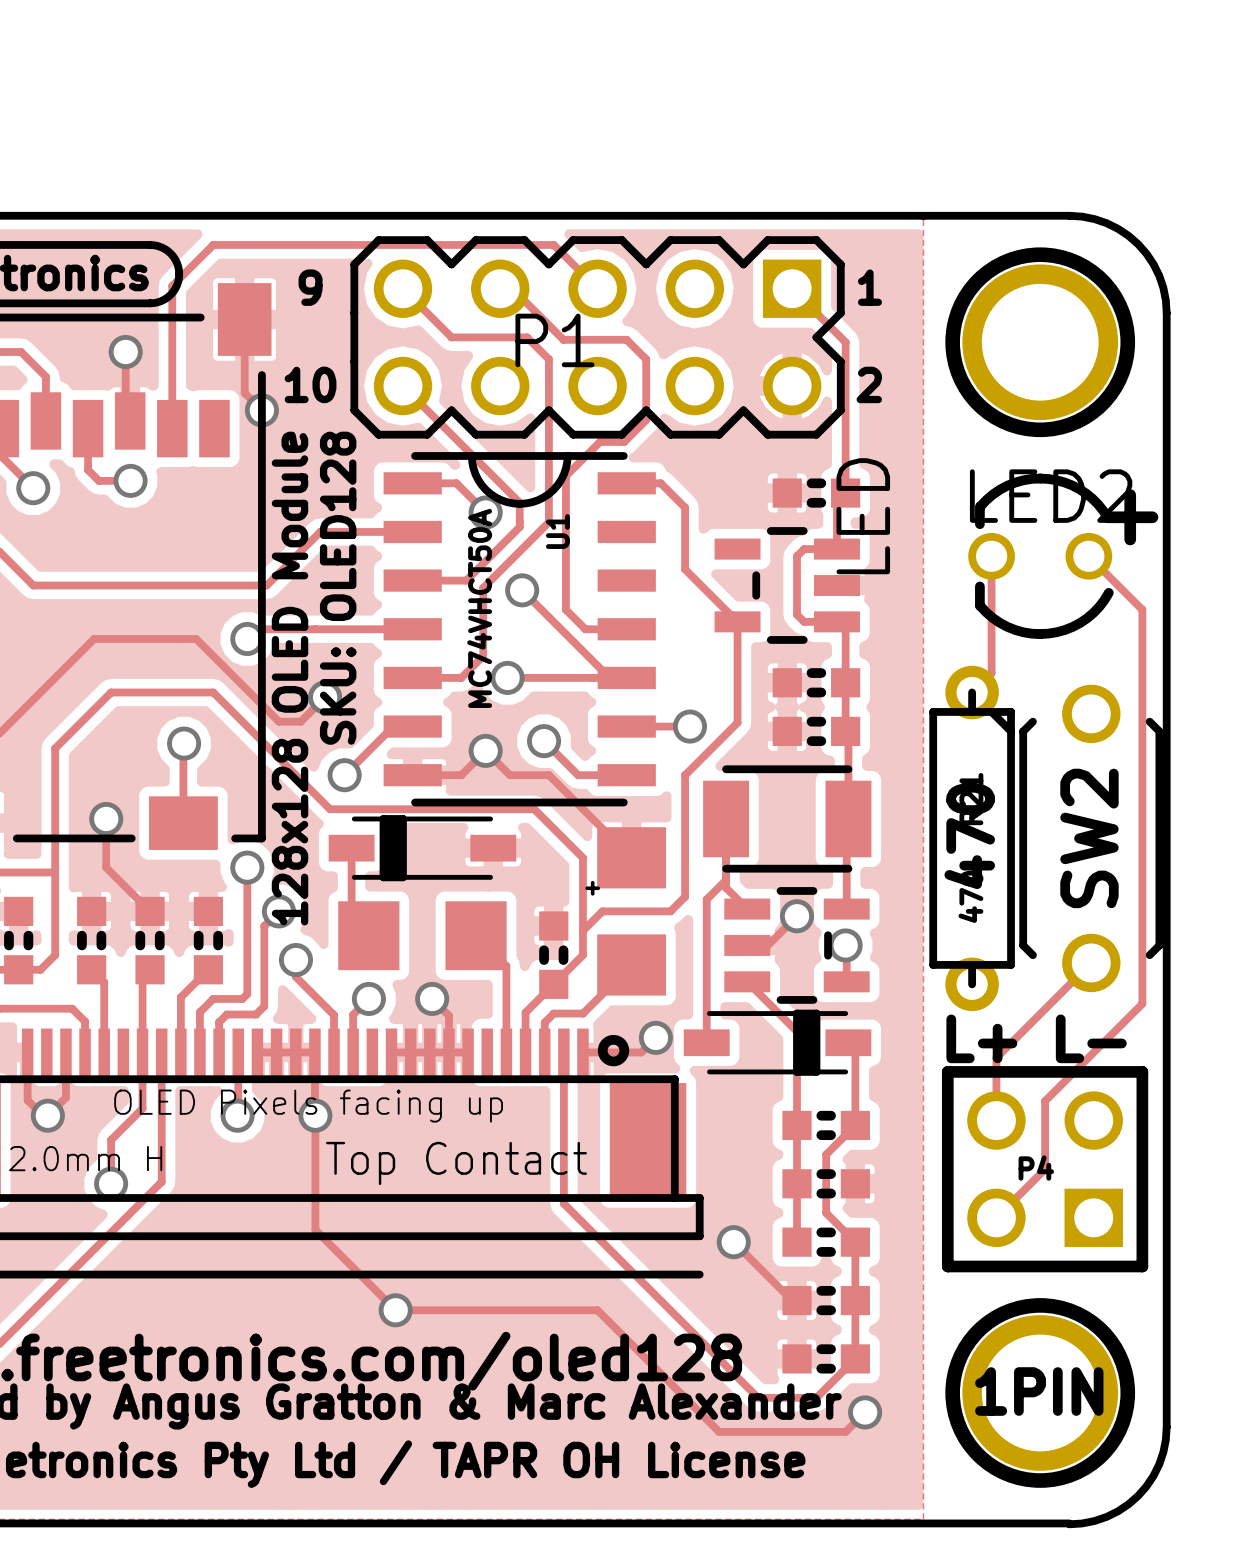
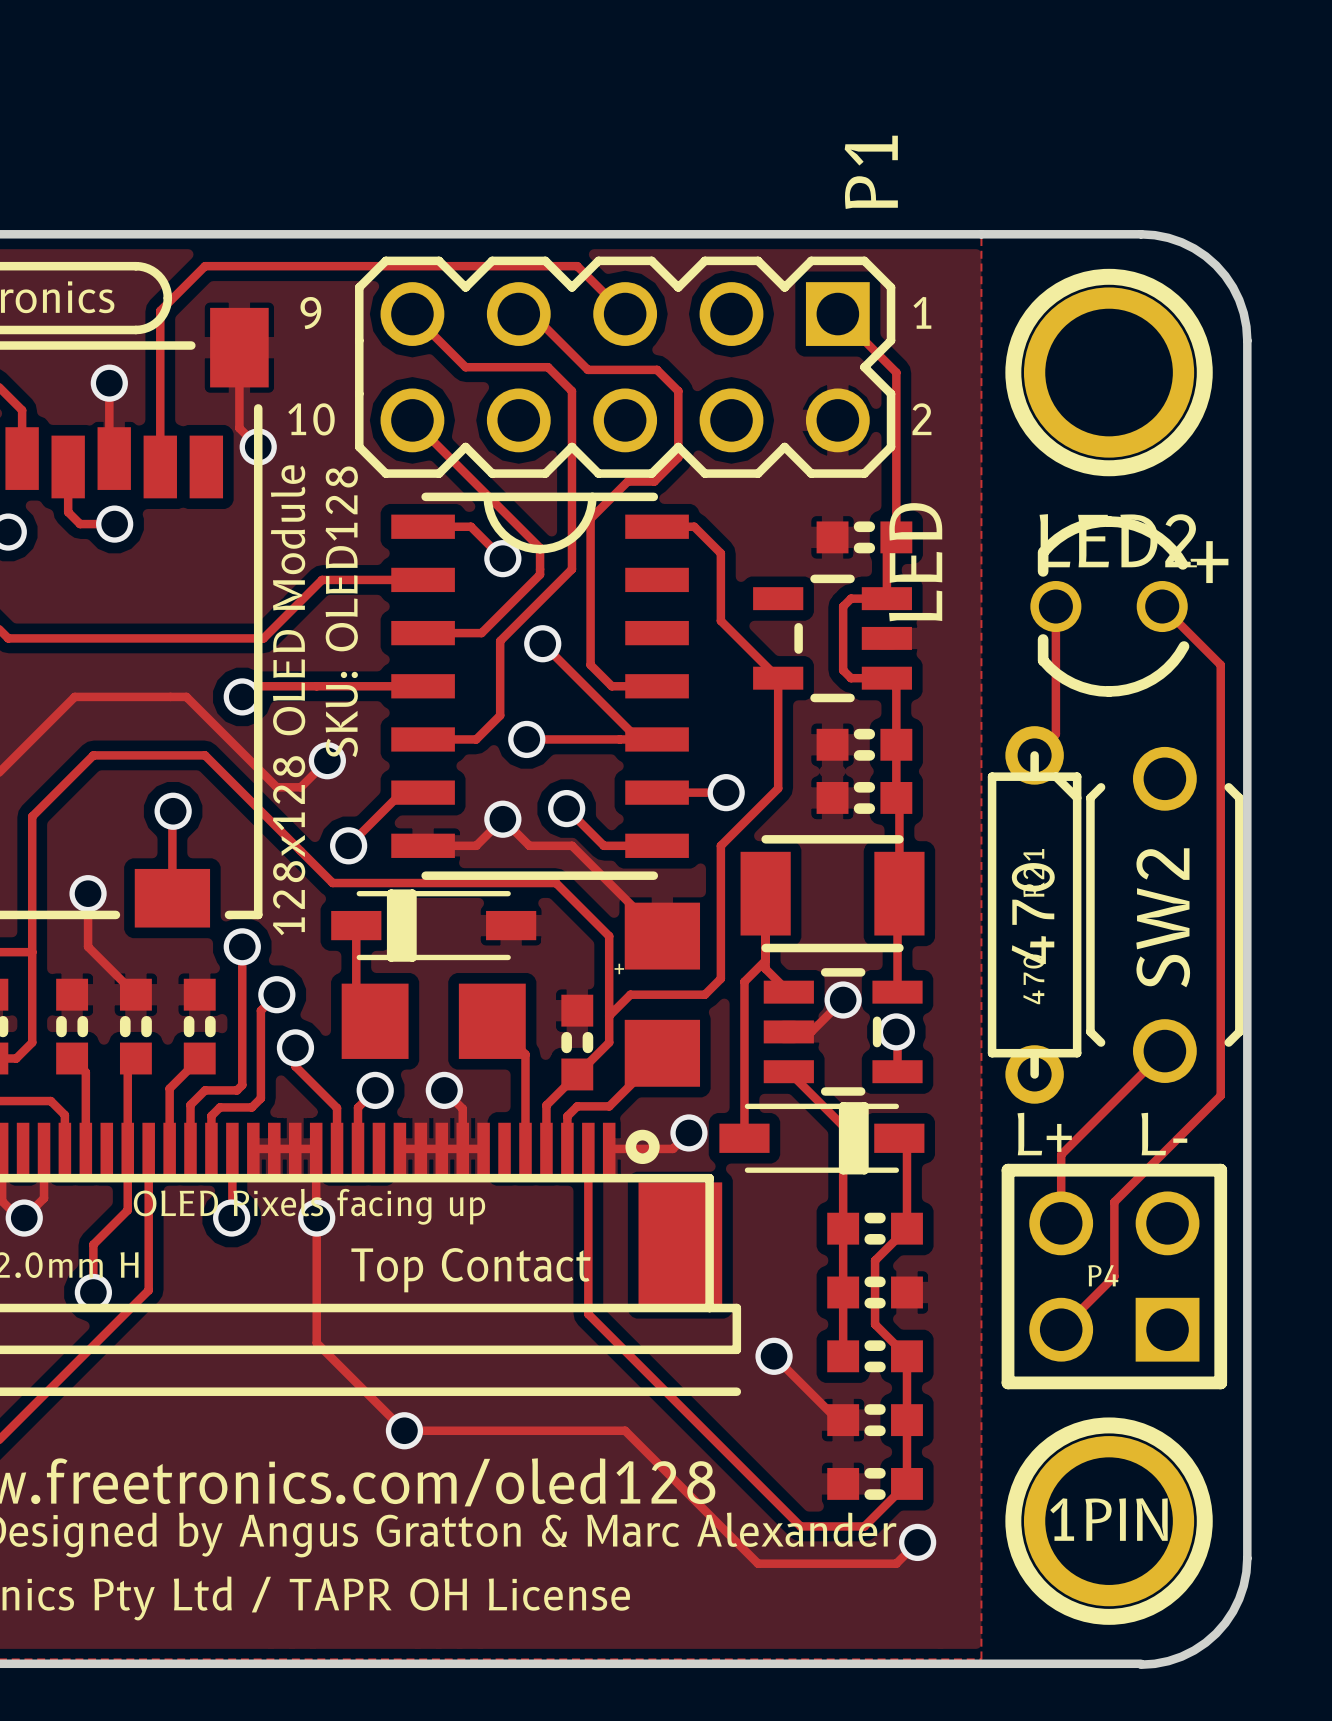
P1 name rotation: 0° (554, 340) -> 90° counterclockwise (871, 172)
P1 name position: P1 (554, 340) -> P1 (871, 172)
U1 name: U1 (557, 531) -> none
U1 value: MC74VHCT50A (479, 608) -> none

